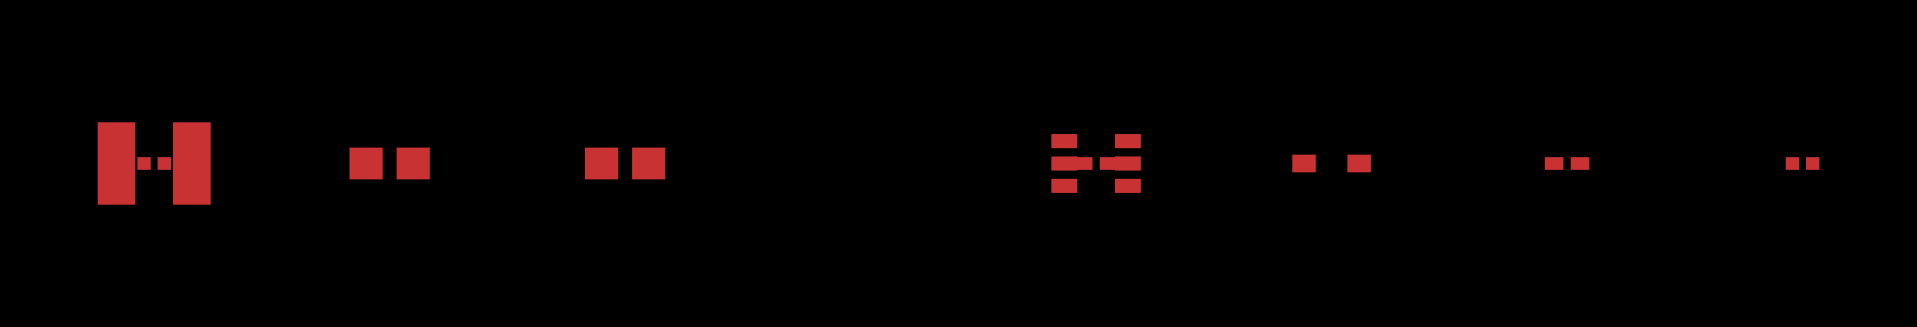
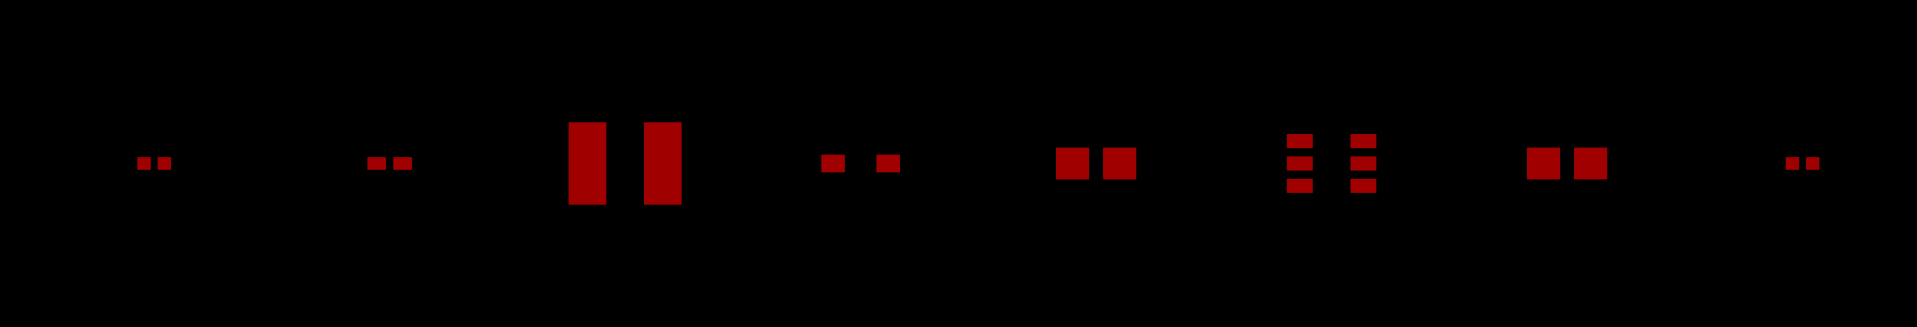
part footprint: [349, 147, 430, 180] -> [367, 157, 412, 170]
part footprint: [585, 147, 666, 180] -> [568, 122, 682, 205]
part footprint: [1292, 154, 1371, 173] -> [1286, 134, 1377, 193]
part footprint: [1544, 157, 1590, 170] -> [1526, 147, 1608, 180]
part: (154, 163) -> none
part: none -> (860, 163)
part: (1096, 163) -> none
part: (1096, 163) -> none
part: none -> (1096, 163)

